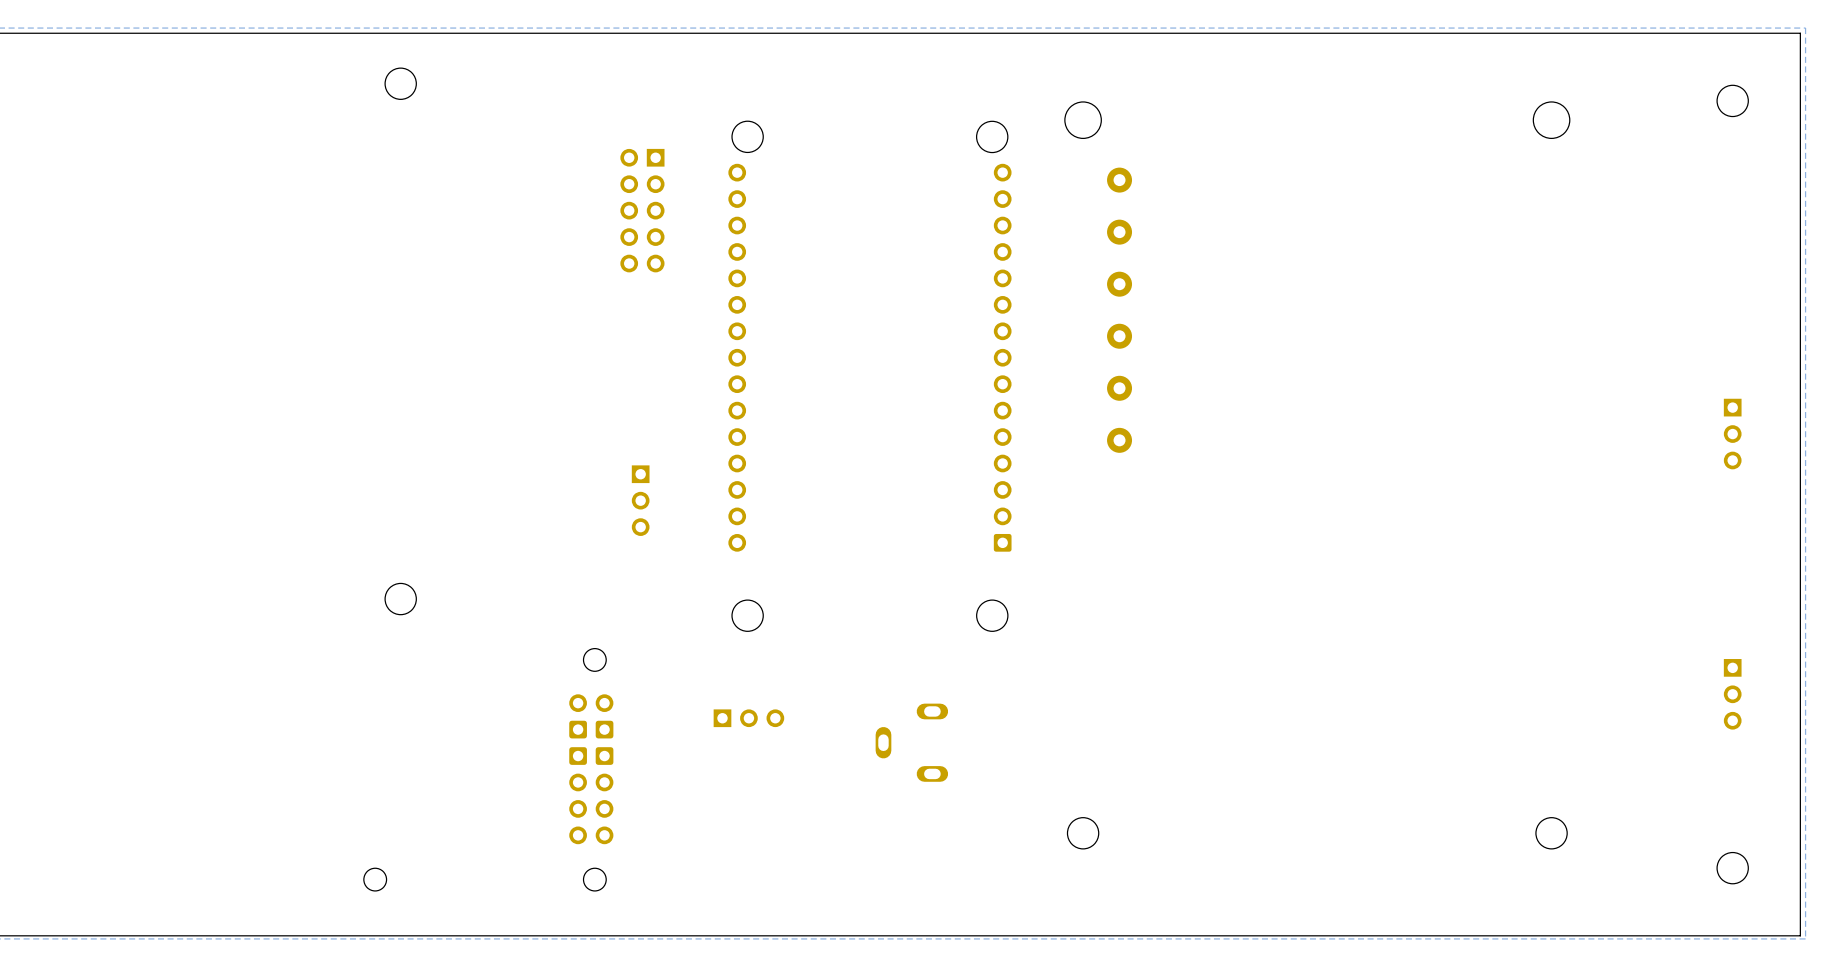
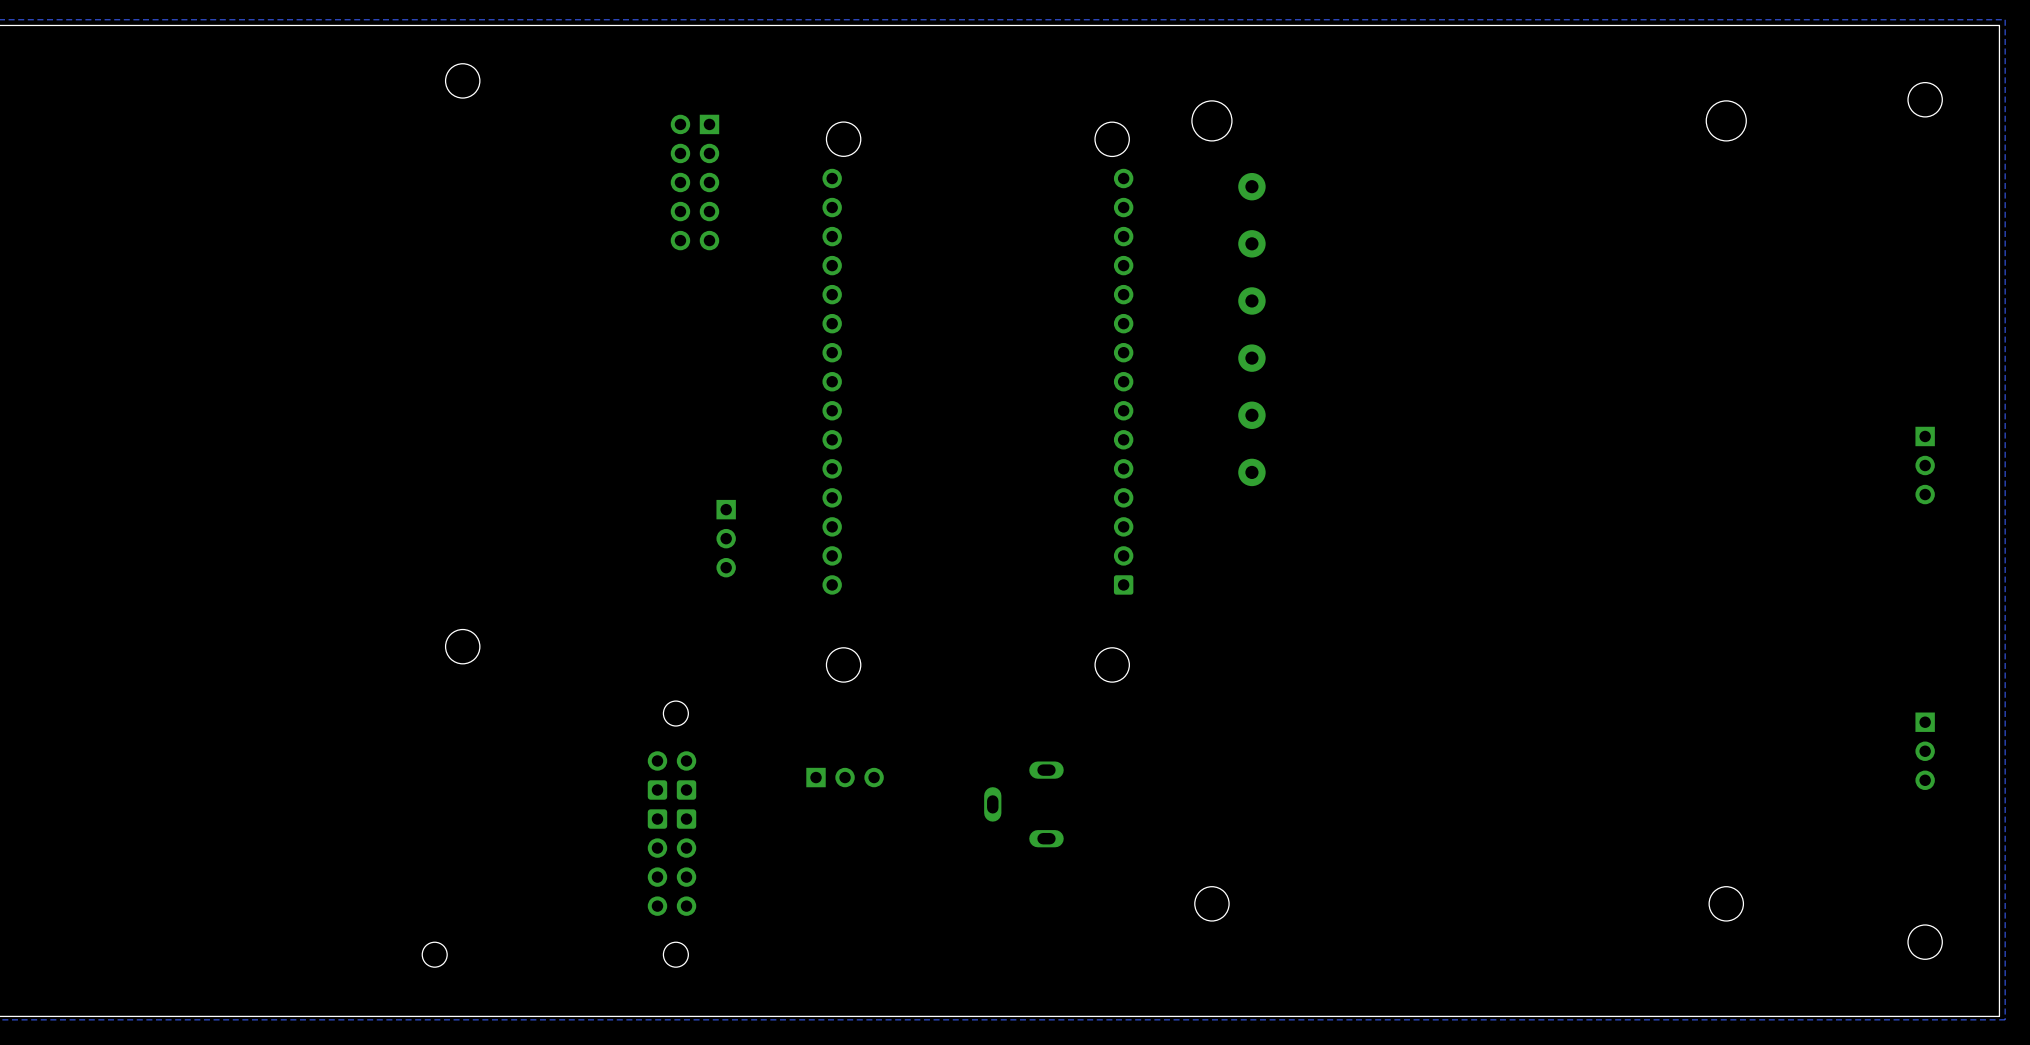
part position: (642, 210) -> (694, 182)

